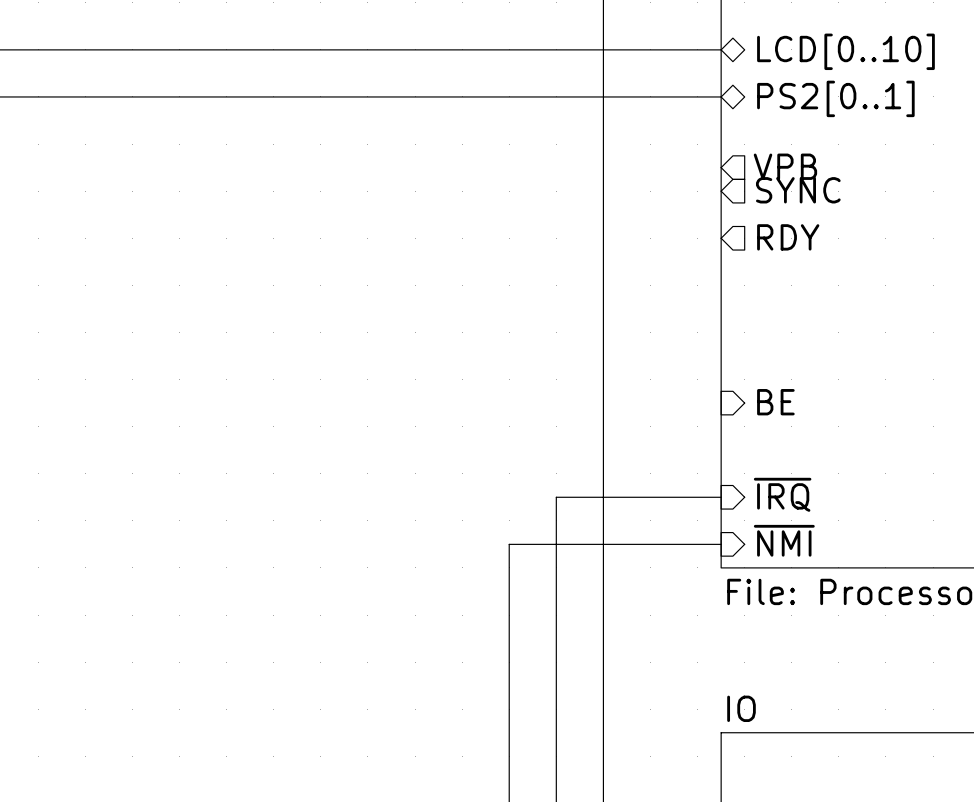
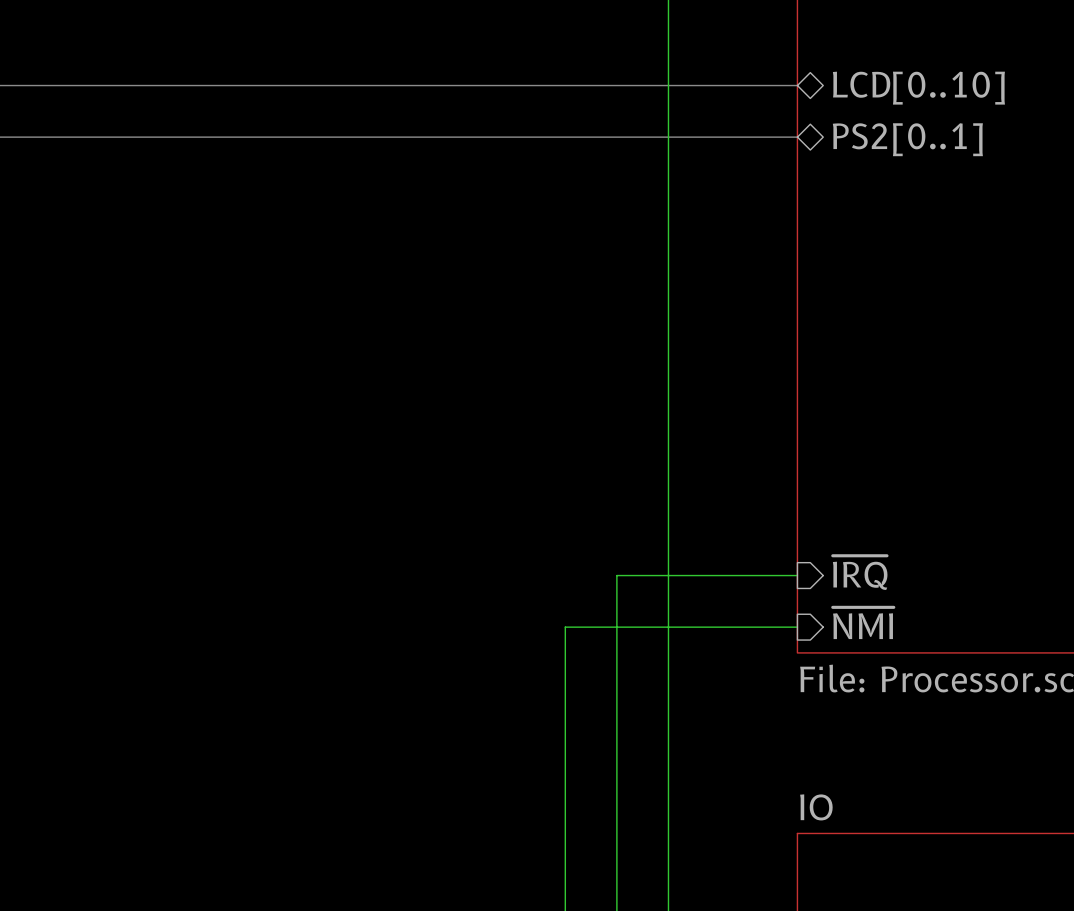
sheet pin: VPB (785, 166) -> none
sheet pin: SYNC (798, 190) -> none
sheet pin: RDY (788, 237) -> none
sheet pin: BE (775, 402) -> none

